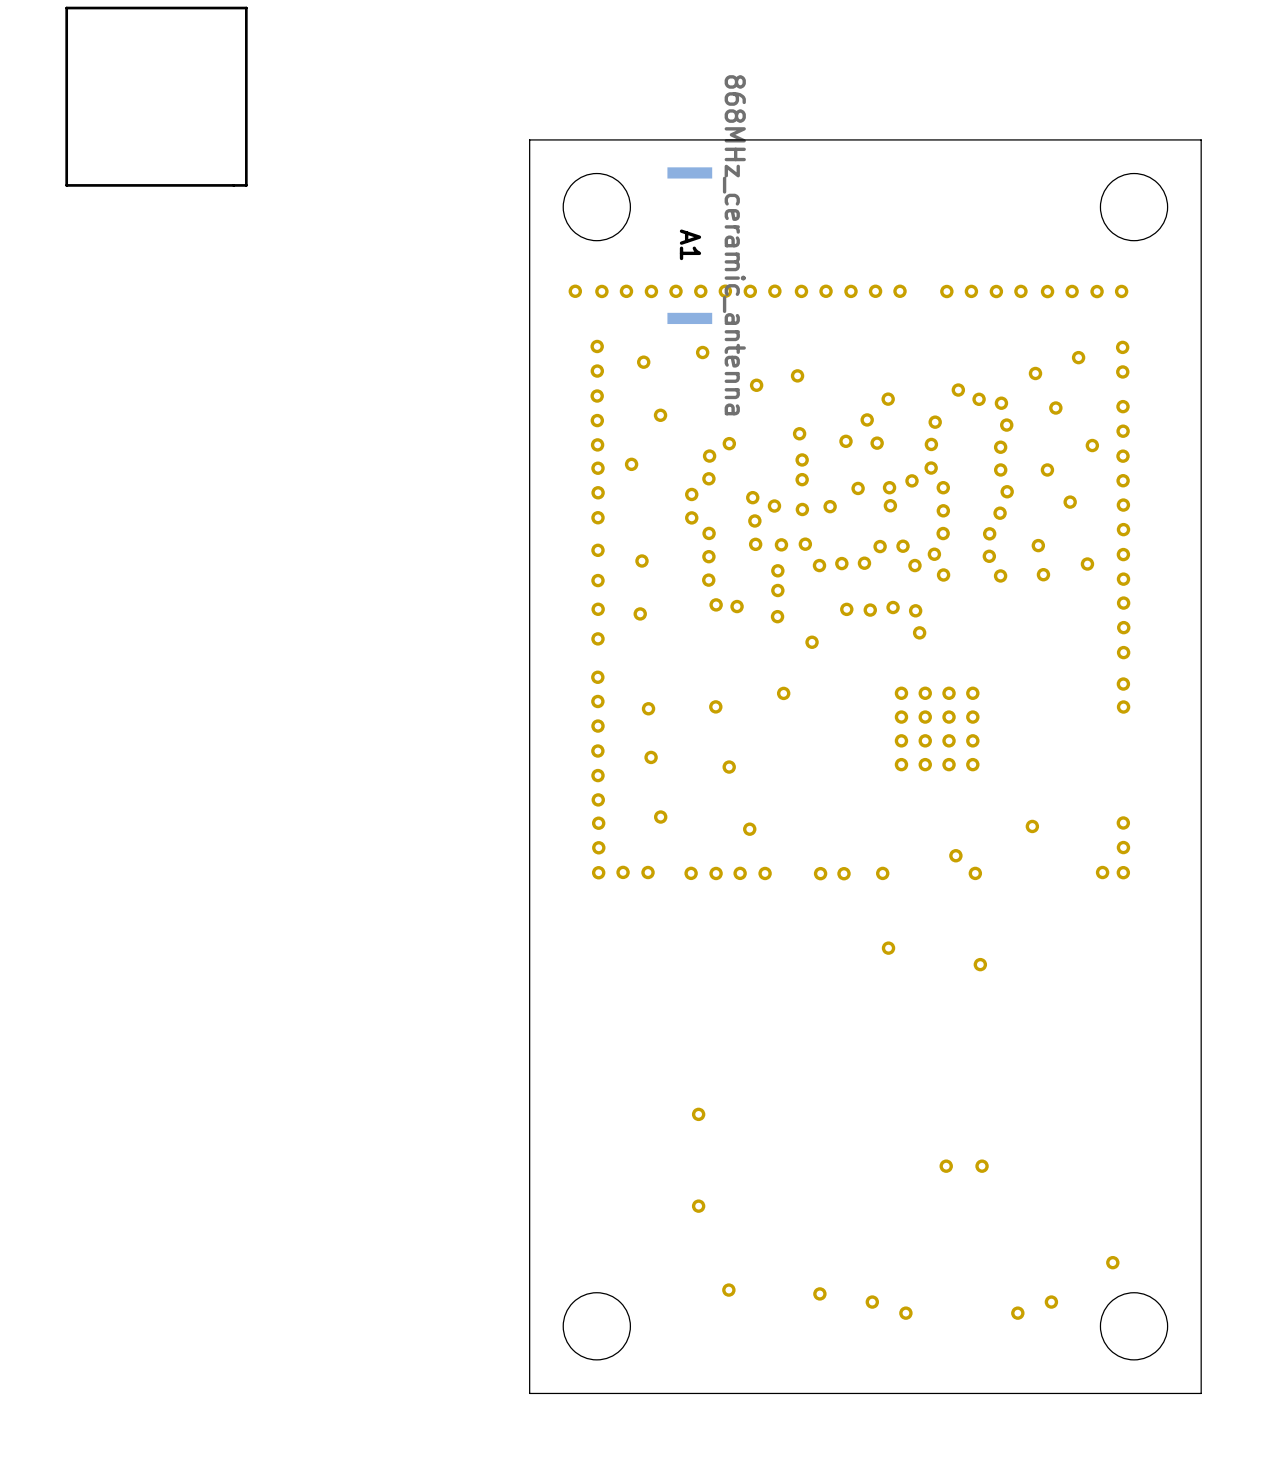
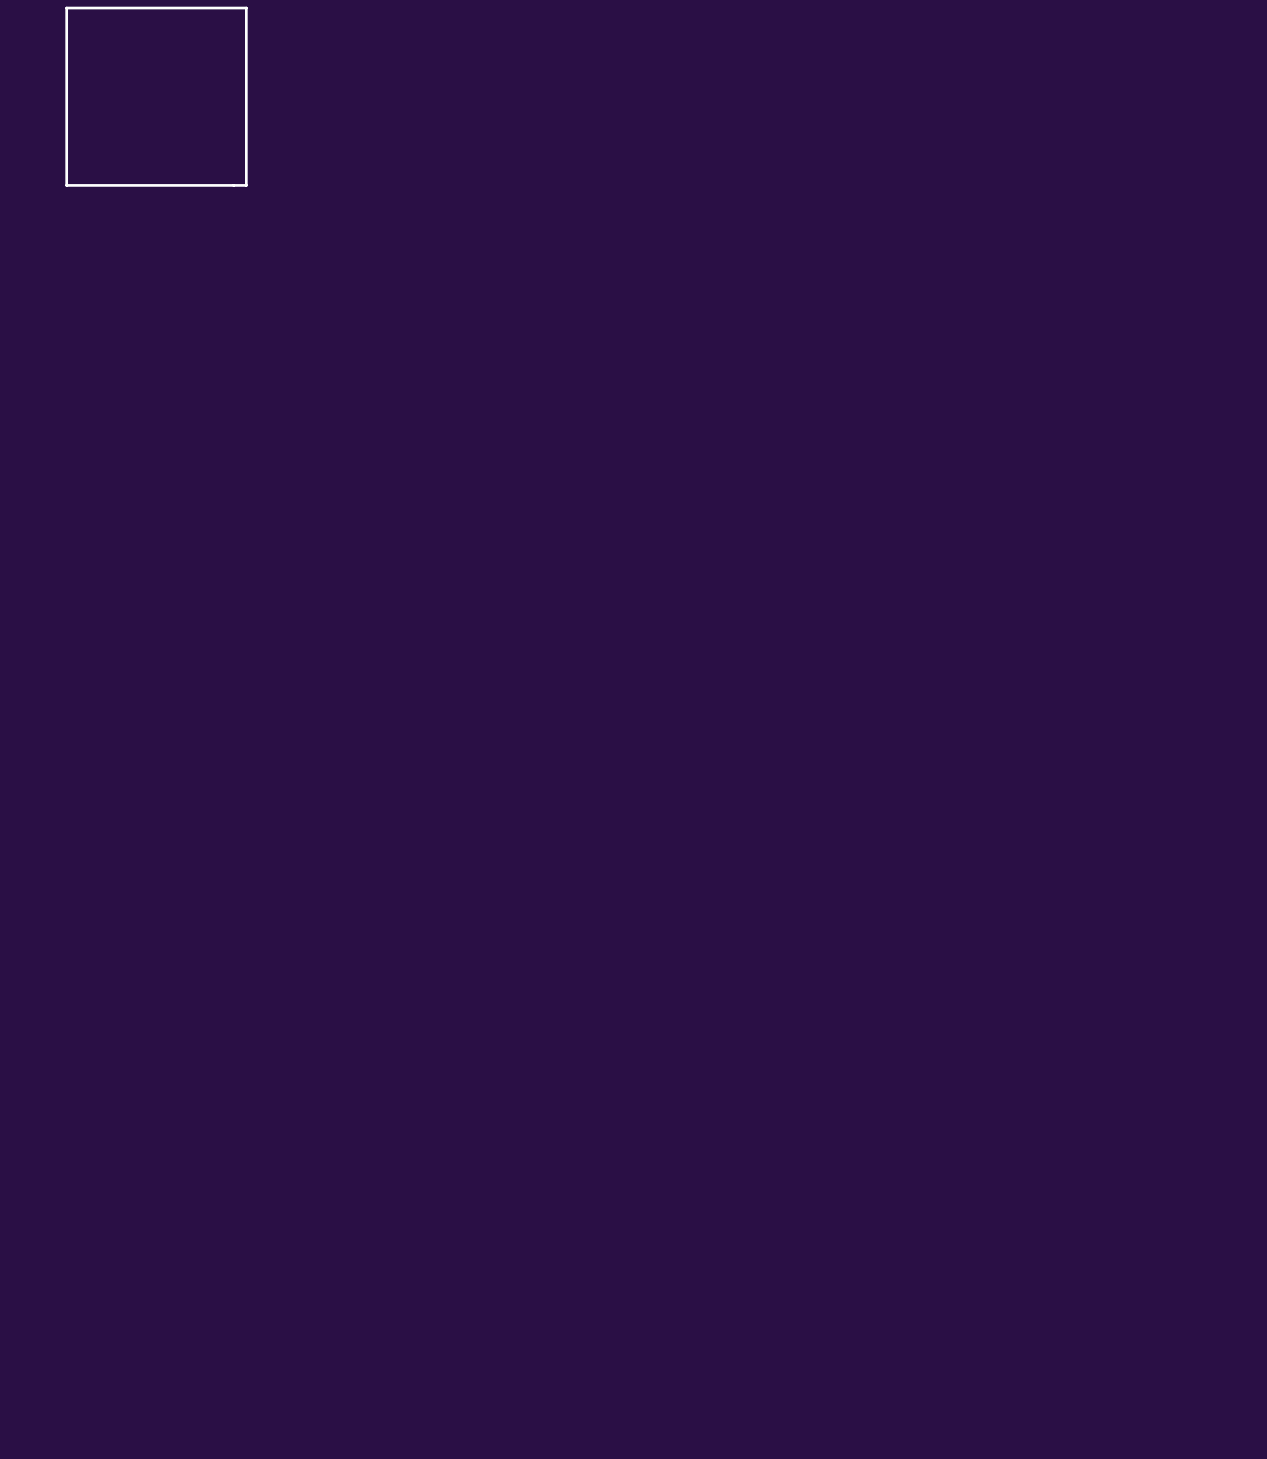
board edge: (1201, 139) (529, 139) (529, 1393) (1201, 1393) (1201, 139) -> none
round board edge: [562, 172, 631, 242] -> none
round board edge: [1099, 172, 1169, 242] -> none
A1: 868MHz_ceramic_antenna (689, 245) -> none
part: (575, 291) -> none
part: (601, 291) -> none
part: (626, 291) -> none
part: (651, 291) -> none
part: (675, 291) -> none
part: (700, 291) -> none
part: (725, 291) -> none
part: (750, 291) -> none
part: (774, 291) -> none
part: (801, 291) -> none
part: (826, 291) -> none
part: (850, 291) -> none
part: (875, 291) -> none
part: (900, 291) -> none
part: (946, 291) -> none
part: (971, 291) -> none
part: (996, 291) -> none
part: (1020, 291) -> none
part: (1047, 291) -> none
part: (1072, 291) -> none
part: (1097, 291) -> none
part: (1121, 291) -> none
part: (597, 346) -> none
part: (1122, 347) -> none
part: (702, 352) -> none
part: (1078, 357) -> none
part: (643, 362) -> none
part: (597, 371) -> none
part: (1122, 371) -> none
part: (1035, 373) -> none
part: (797, 375) -> none
part: (756, 385) -> none
part: (958, 390) -> none
part: (597, 396) -> none
part: (888, 399) -> none
part: (979, 399) -> none
part: (1001, 403) -> none
part: (1122, 406) -> none
part: (1055, 408) -> none
part: (660, 415) -> none
part: (867, 419) -> none
part: (597, 420) -> none
part: (935, 422) -> none
part: (1006, 425) -> none
part: (1123, 431) -> none
part: (799, 433) -> none
part: (845, 441) -> none
part: (729, 443) -> none
part: (877, 443) -> none
part: (597, 444) -> none
part: (931, 444) -> none
part: (1092, 445) -> none
part: (1000, 447) -> none
part: (709, 456) -> none
part: (1122, 456) -> none
part: (802, 459) -> none
part: (631, 464) -> none
part: (597, 468) -> none
part: (931, 468) -> none
part: (1000, 469) -> none
part: (1047, 469) -> none
part: (708, 478) -> none
part: (802, 479) -> none
part: (912, 480) -> none
part: (1123, 480) -> none
part: (889, 487) -> none
part: (943, 487) -> none
part: (858, 488) -> none
part: (1007, 491) -> none
part: (598, 492) -> none
part: (691, 494) -> none
part: (752, 497) -> none
part: (1070, 502) -> none
part: (890, 505) -> none
part: (1123, 505) -> none
part: (774, 506) -> none
part: (830, 506) -> none
part: (802, 509) -> none
part: (943, 510) -> none
part: (1000, 513) -> none
part: (597, 517) -> none
part: (691, 517) -> none
part: (754, 520) -> none
part: (1123, 529) -> none
part: (709, 533) -> none
part: (943, 533) -> none
part: (989, 533) -> none
part: (755, 544) -> none
part: (781, 544) -> none
part: (805, 544) -> none
part: (1038, 545) -> none
part: (880, 546) -> none
part: (903, 546) -> none
part: (597, 550) -> none
part: (934, 554) -> none
part: (1123, 554) -> none
part: (708, 556) -> none
part: (989, 556) -> none
part: (641, 561) -> none
part: (841, 563) -> none
part: (864, 563) -> none
part: (1087, 564) -> none
part: (819, 565) -> none
part: (914, 565) -> none
part: (777, 570) -> none
part: (943, 574) -> none
part: (1043, 574) -> none
part: (1000, 575) -> none
part: (1123, 579) -> none
part: (597, 580) -> none
part: (708, 580) -> none
part: (777, 590) -> none
part: (1123, 603) -> none
part: (716, 604) -> none
part: (737, 606) -> none
part: (893, 607) -> none
part: (598, 609) -> none
part: (846, 609) -> none
part: (870, 610) -> none
part: (915, 610) -> none
part: (640, 613) -> none
part: (777, 616) -> none
part: (1123, 627) -> none
part: (919, 632) -> none
part: (597, 638) -> none
part: (812, 642) -> none
part: (1123, 652) -> none
part: (597, 677) -> none
part: (1123, 684) -> none
part: (783, 693) -> none
part: (901, 693) -> none
part: (925, 693) -> none
part: (949, 693) -> none
part: (972, 693) -> none
part: (597, 701) -> none
part: (715, 706) -> none
part: (1123, 707) -> none
part: (648, 708) -> none
part: (901, 717) -> none
part: (925, 717) -> none
part: (949, 717) -> none
part: (972, 717) -> none
part: (597, 726) -> none
part: (901, 740) -> none
part: (925, 740) -> none
part: (949, 740) -> none
part: (972, 740) -> none
part: (597, 751) -> none
part: (651, 757) -> none
part: (901, 764) -> none
part: (925, 764) -> none
part: (949, 764) -> none
part: (972, 764) -> none
part: (729, 767) -> none
part: (597, 775) -> none
part: (598, 799) -> none
part: (660, 817) -> none
part: (1123, 822) -> none
part: (598, 823) -> none
part: (1032, 826) -> none
part: (749, 829) -> none
part: (598, 847) -> none
part: (1123, 847) -> none
part: (955, 855) -> none
part: (598, 872) -> none
part: (623, 872) -> none
part: (648, 872) -> none
part: (1102, 872) -> none
part: (1123, 872) -> none
part: (691, 873) -> none
part: (716, 873) -> none
part: (740, 873) -> none
part: (765, 873) -> none
part: (820, 873) -> none
part: (844, 873) -> none
part: (882, 873) -> none
part: (975, 873) -> none
part: (888, 948) -> none
part: (980, 964) -> none
part: (698, 1114) -> none
part: (946, 1166) -> none
part: (982, 1166) -> none
part: (698, 1206) -> none
part: (1112, 1262) -> none
part: (728, 1290) -> none
round board edge: [562, 1292, 631, 1361] -> none
round board edge: [1099, 1292, 1169, 1361] -> none
part: (819, 1293) -> none
part: (872, 1302) -> none
part: (1051, 1302) -> none
part: (905, 1313) -> none
part: (1017, 1313) -> none

